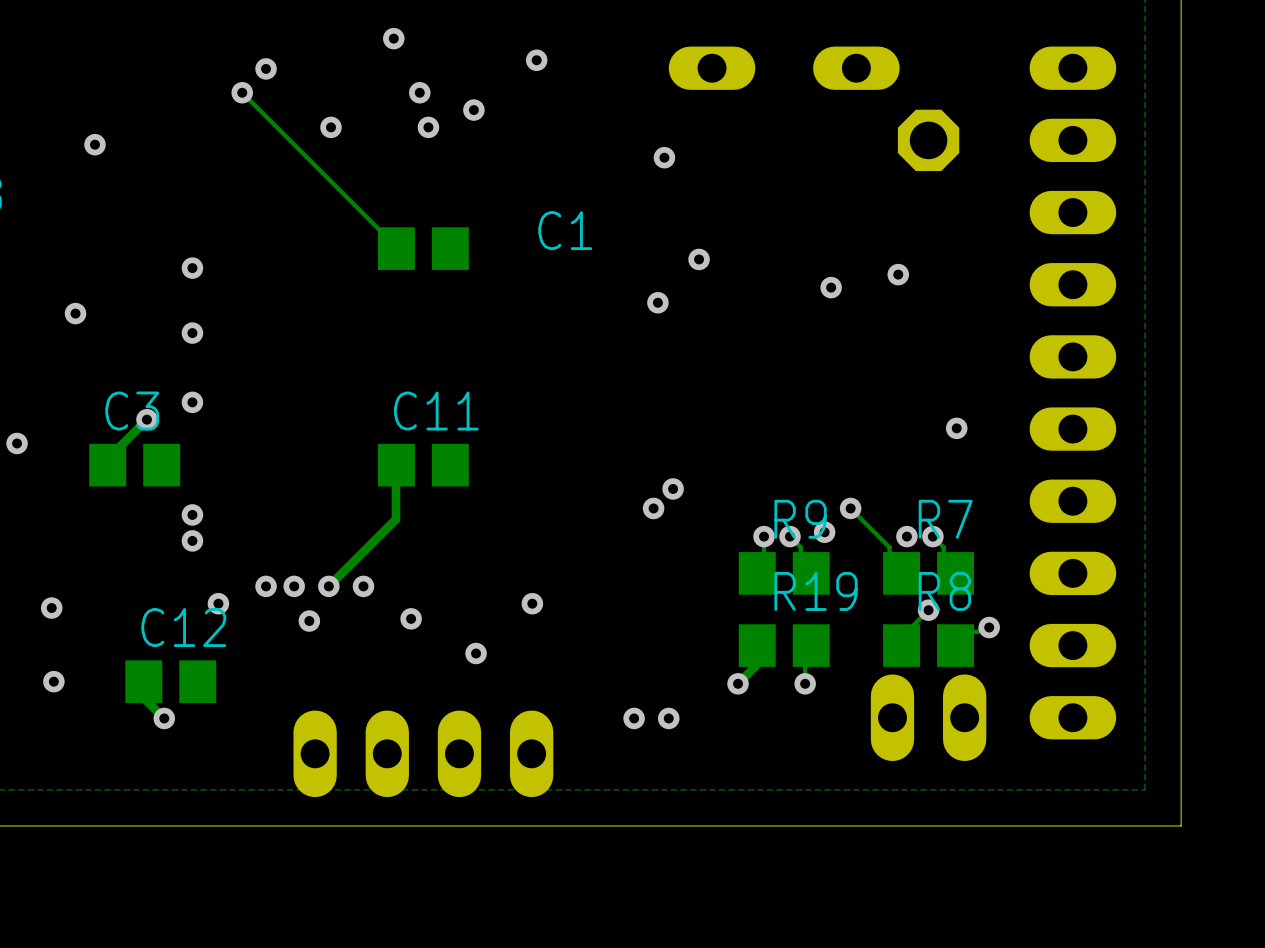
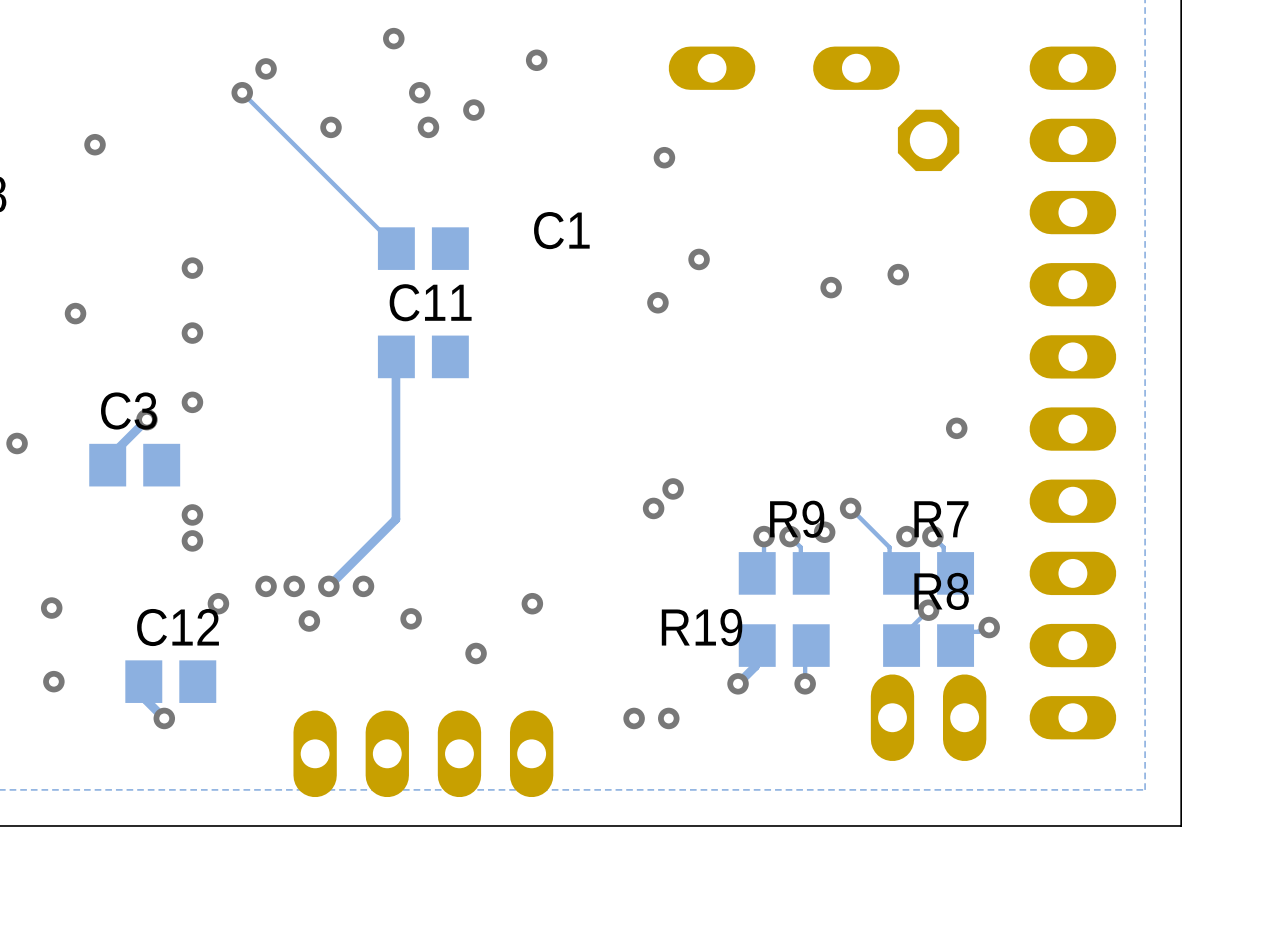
track: none -> (395, 356) (395, 465)
C11 position: (423, 465) -> (423, 356)
R19 name position: R19 (816, 591) -> R19 (702, 627)

